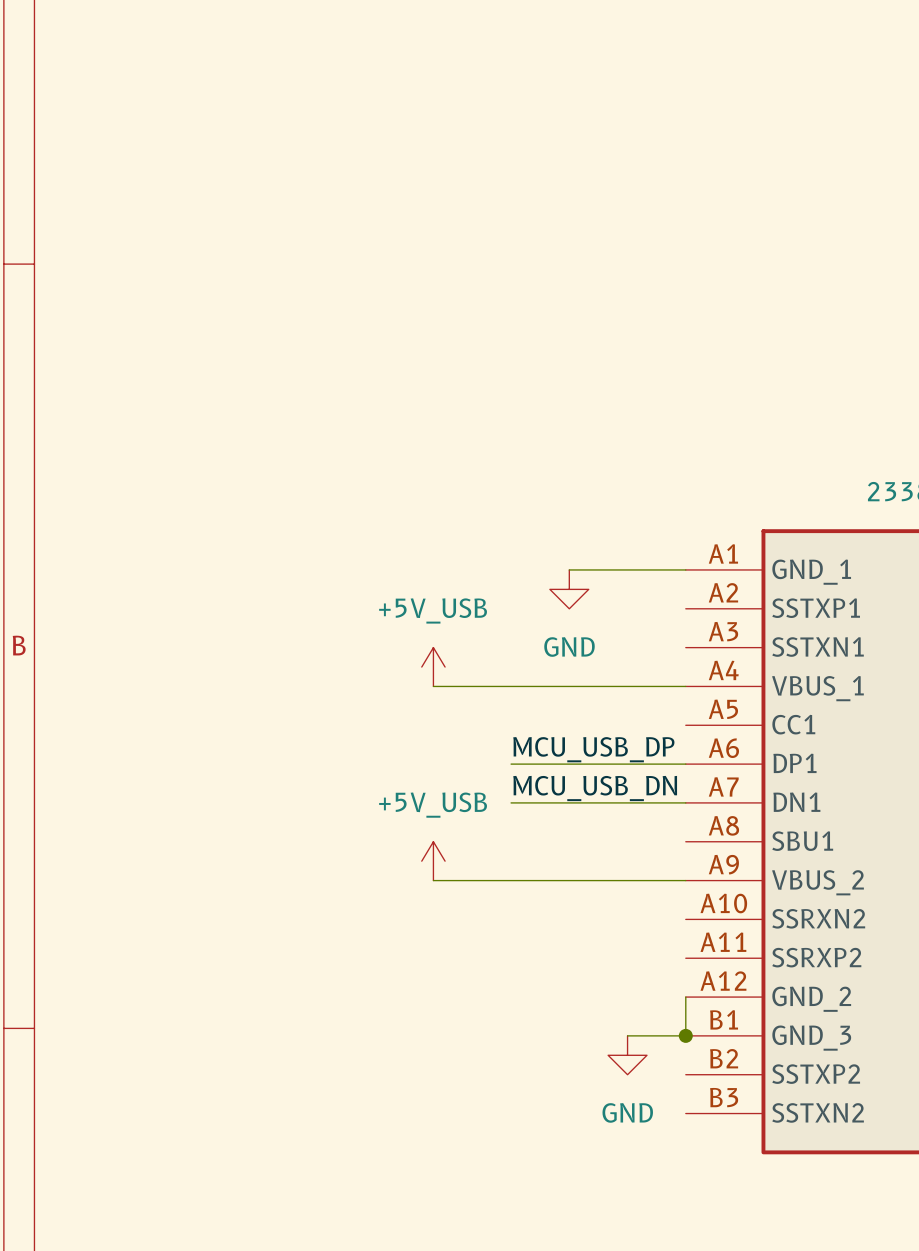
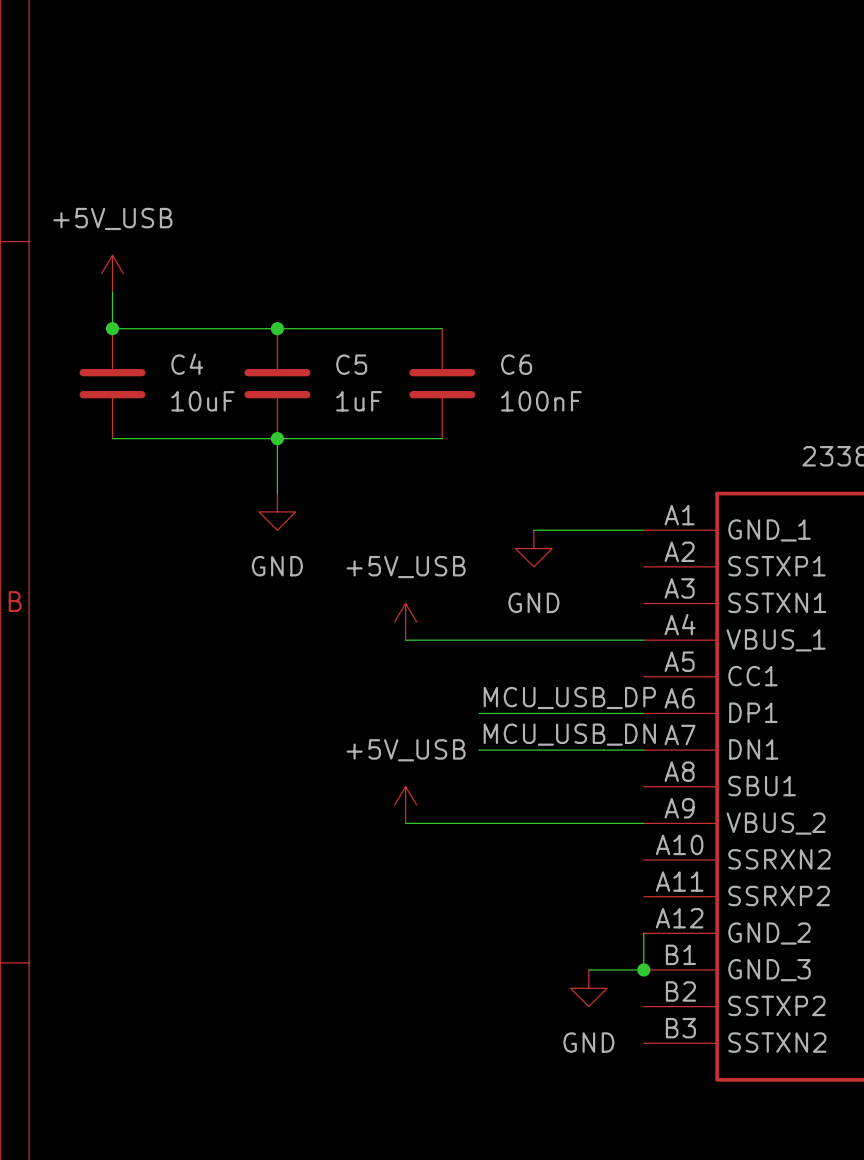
power symbol: none -> +5V_USB (112, 273)
wire: none -> (112, 292) (112, 328) (442, 328)
junction: none -> (112, 328)
junction: none -> (277, 328)
C4: none -> 10uF (112, 383)
C5: none -> 1uF (277, 383)
C6: none -> 100nF (442, 383)
wire: none -> (112, 438) (442, 438)
wire: none -> (277, 438) (277, 493)
junction: none -> (277, 438)
power symbol: none -> GND (277, 511)

